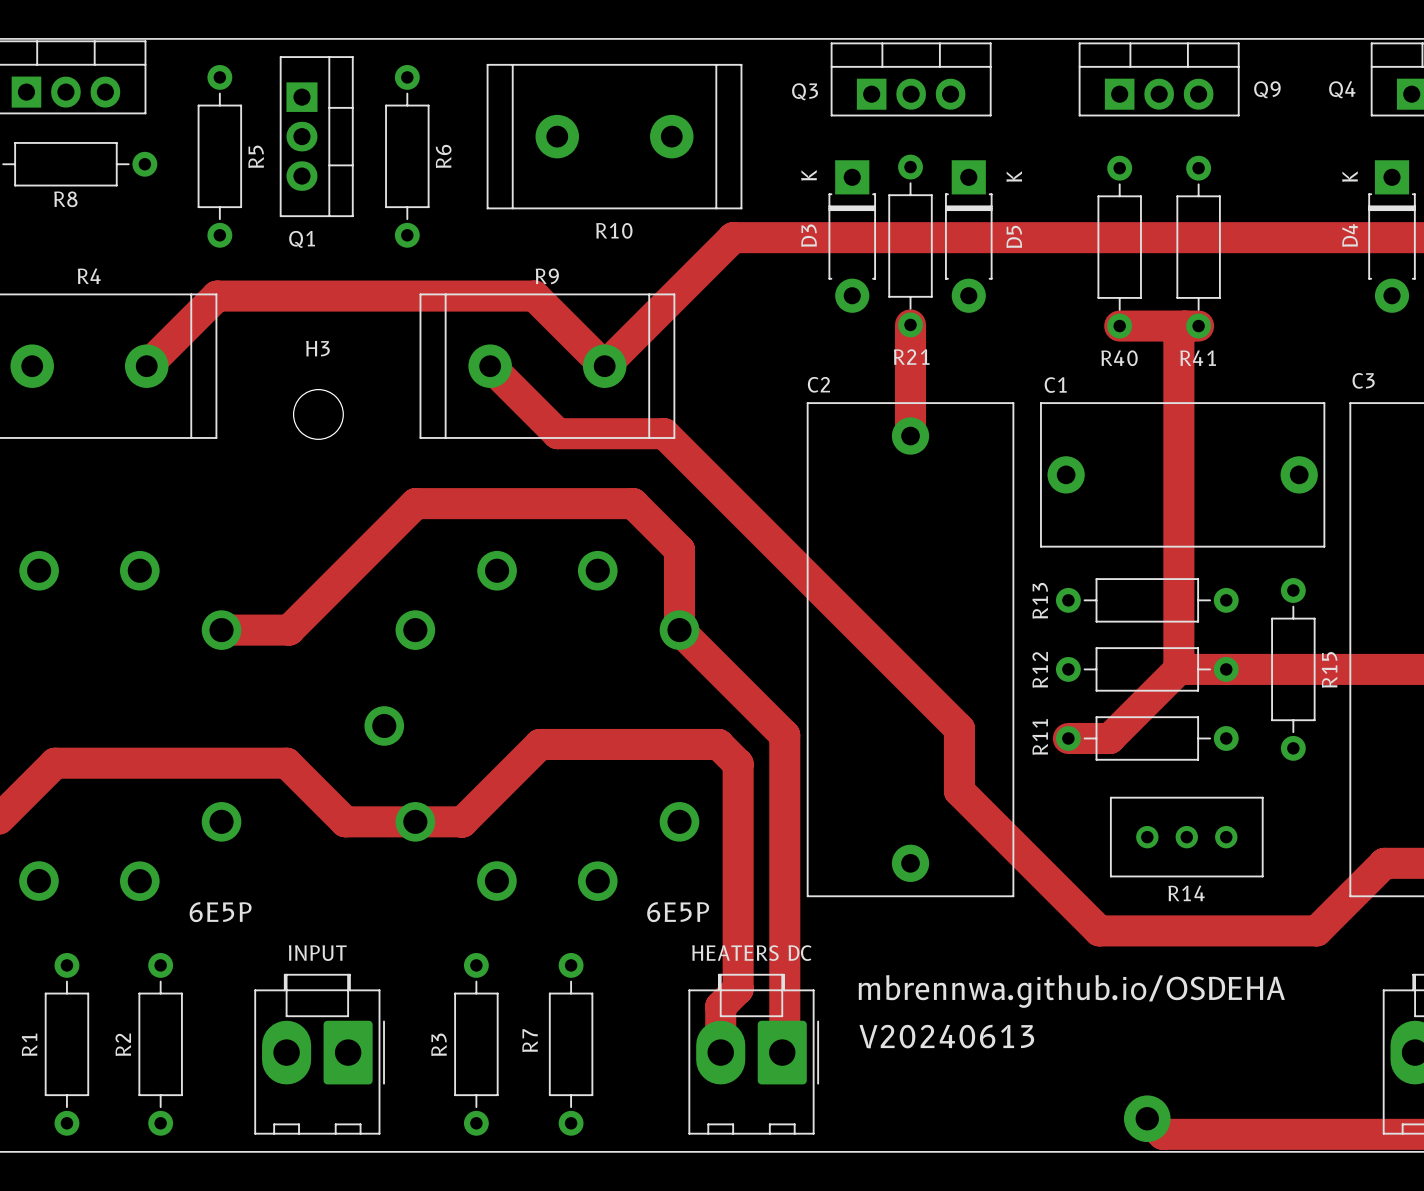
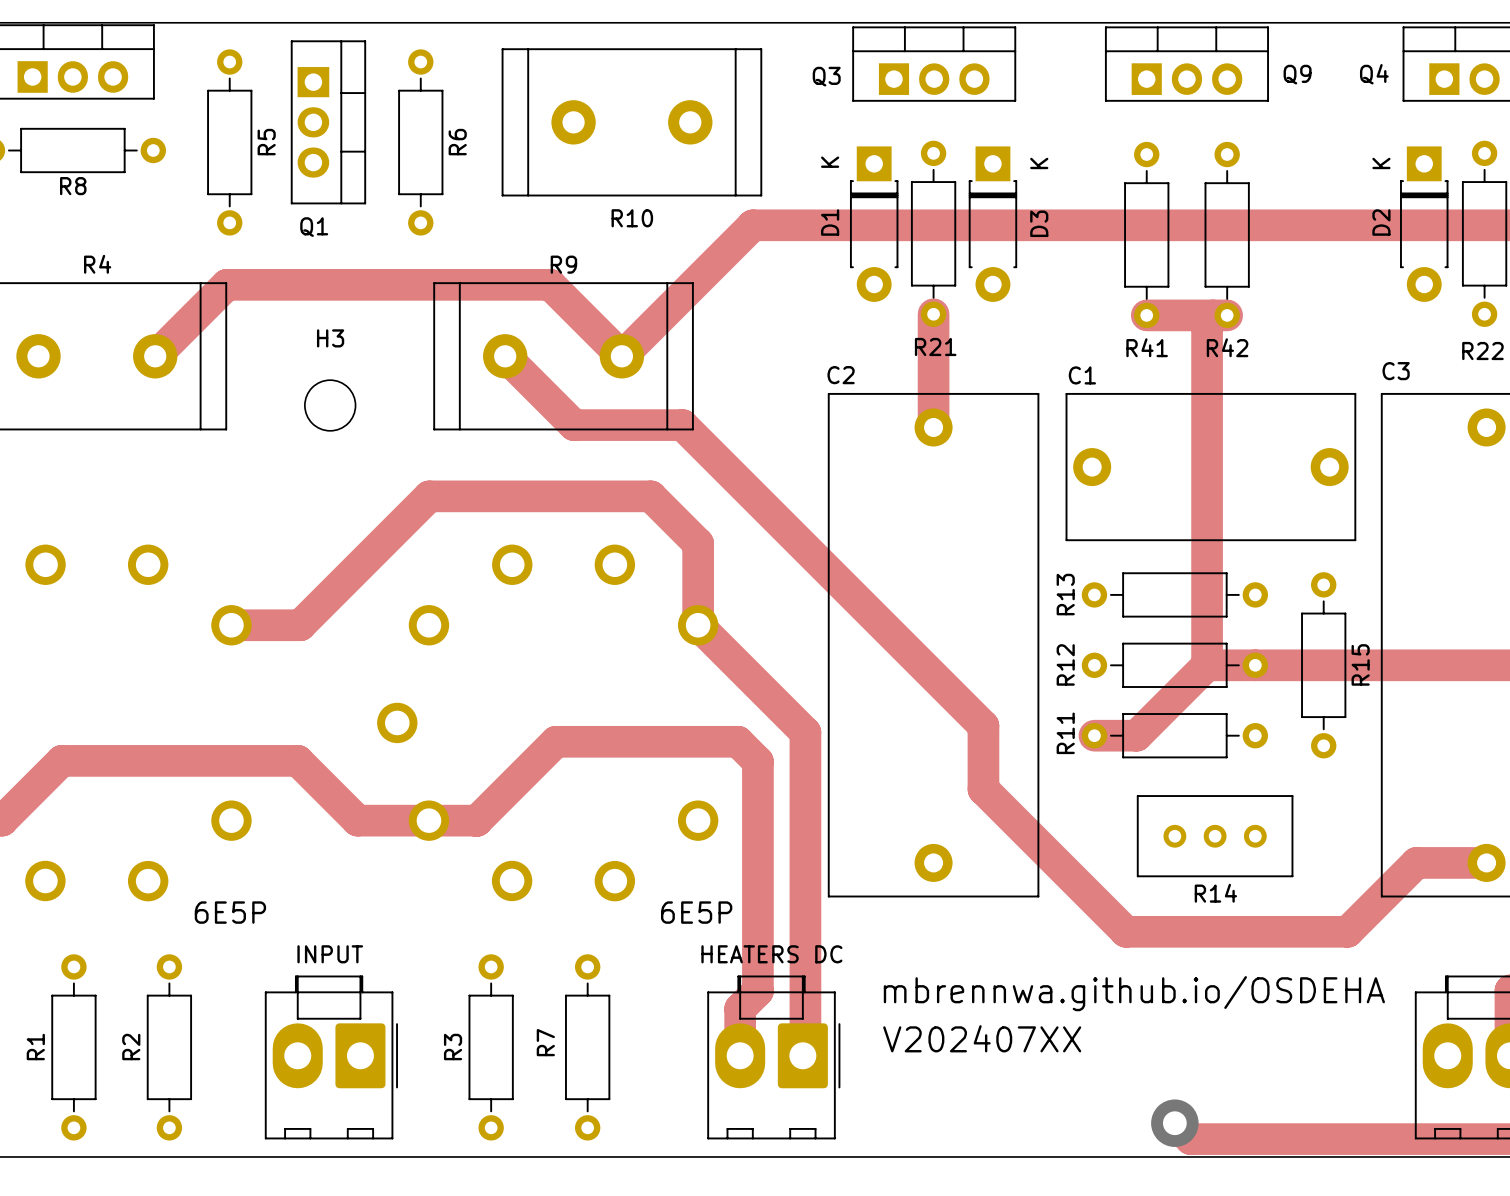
D3 name: D3 (809, 235) -> D1 (830, 222)
D4 name: D4 (1349, 235) -> D2 (1381, 222)
D5 name: D5 (1014, 236) -> D3 (1039, 223)
R40 name: R40 (1119, 358) -> R41 (1147, 347)
R41 name: R41 (1198, 358) -> R42 (1227, 347)
text: V20240613 (946, 1036) -> V202407XX (982, 1038)

